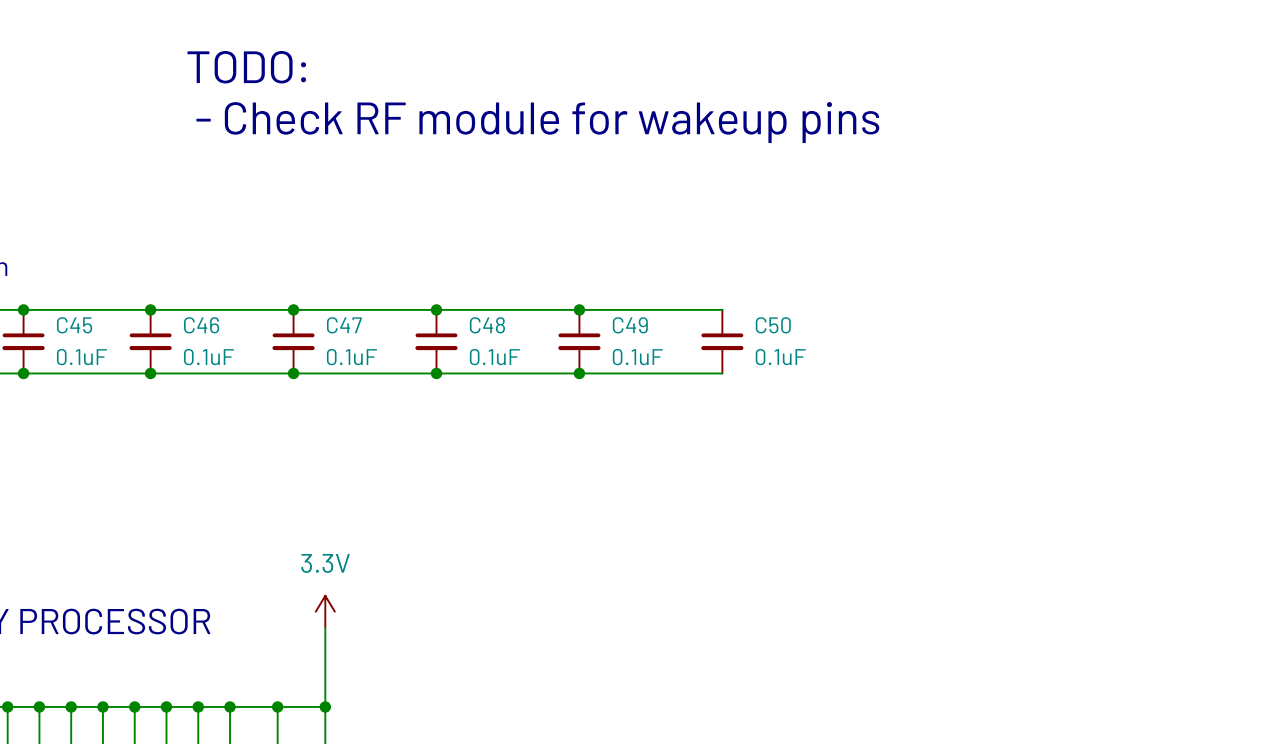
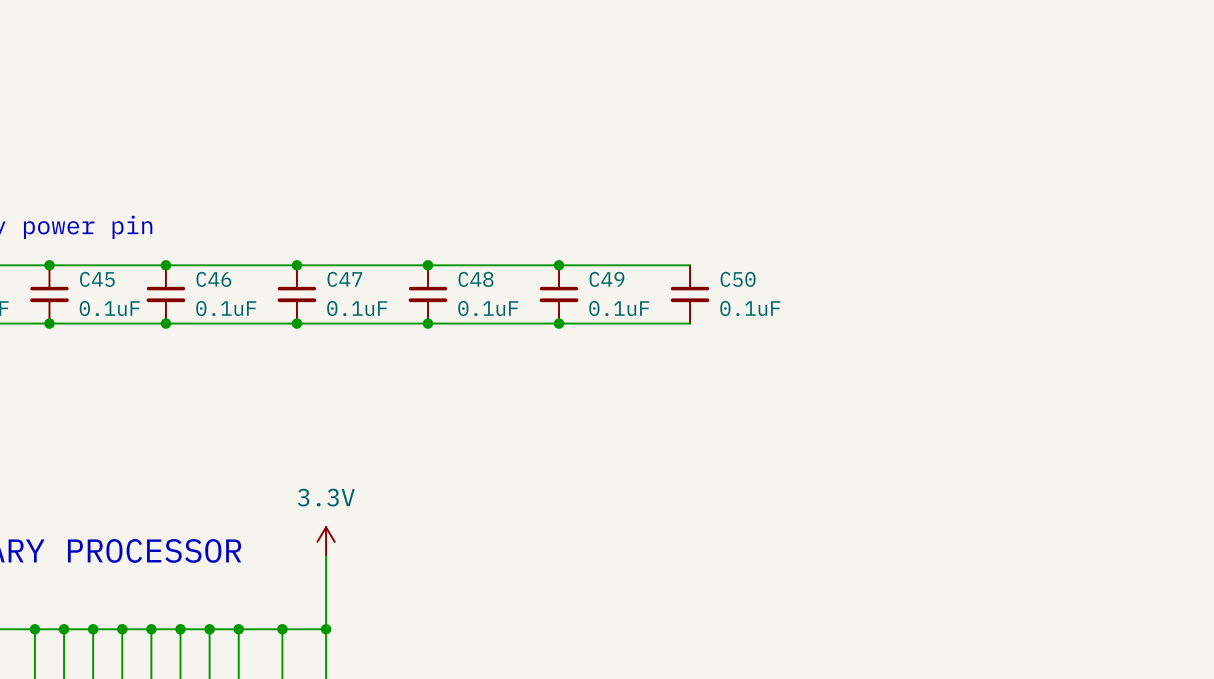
text: TODO: (246, 67) -> none
text: - Check RF module for wakeup pins (537, 122) -> none

